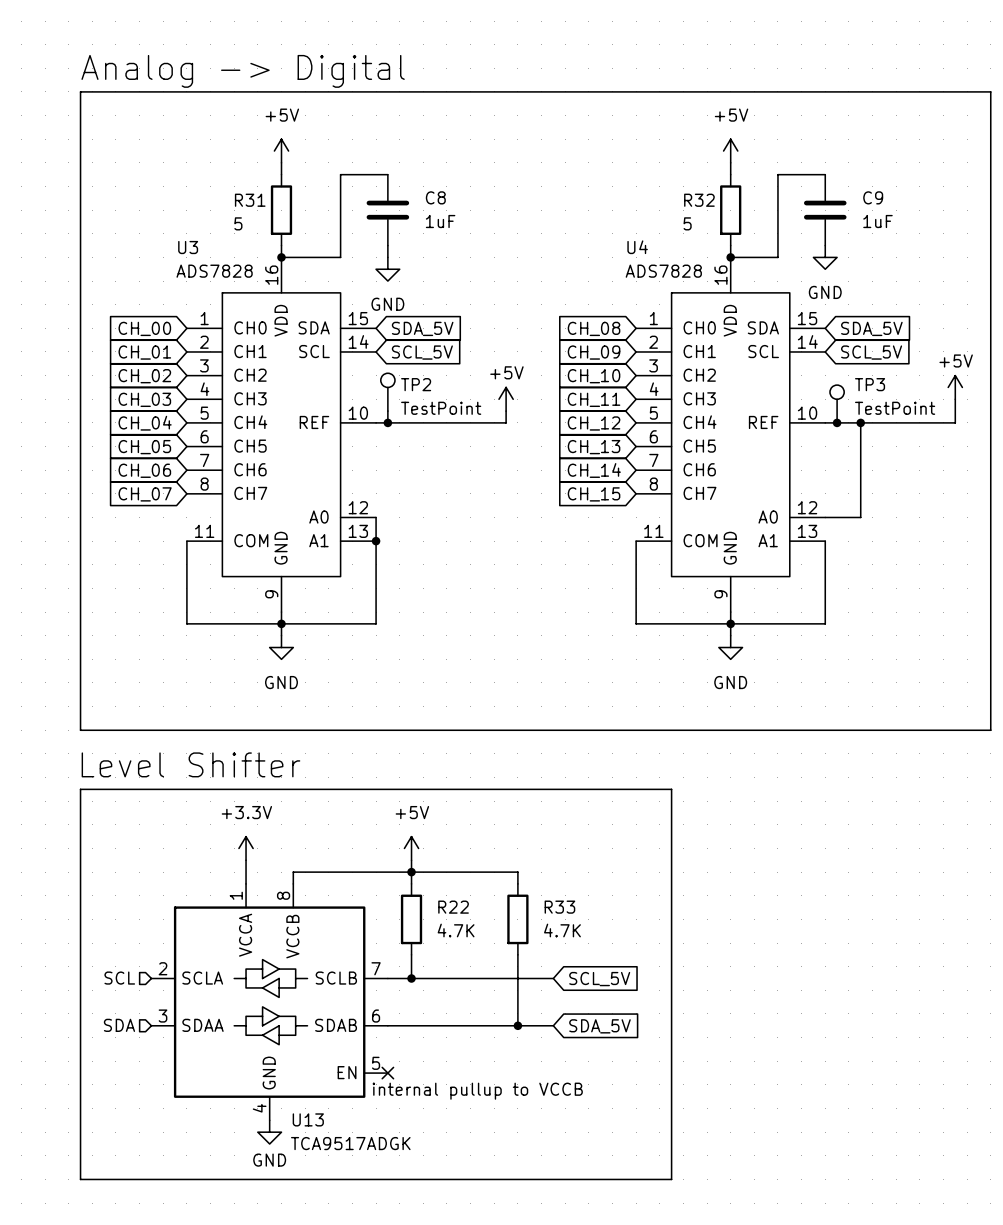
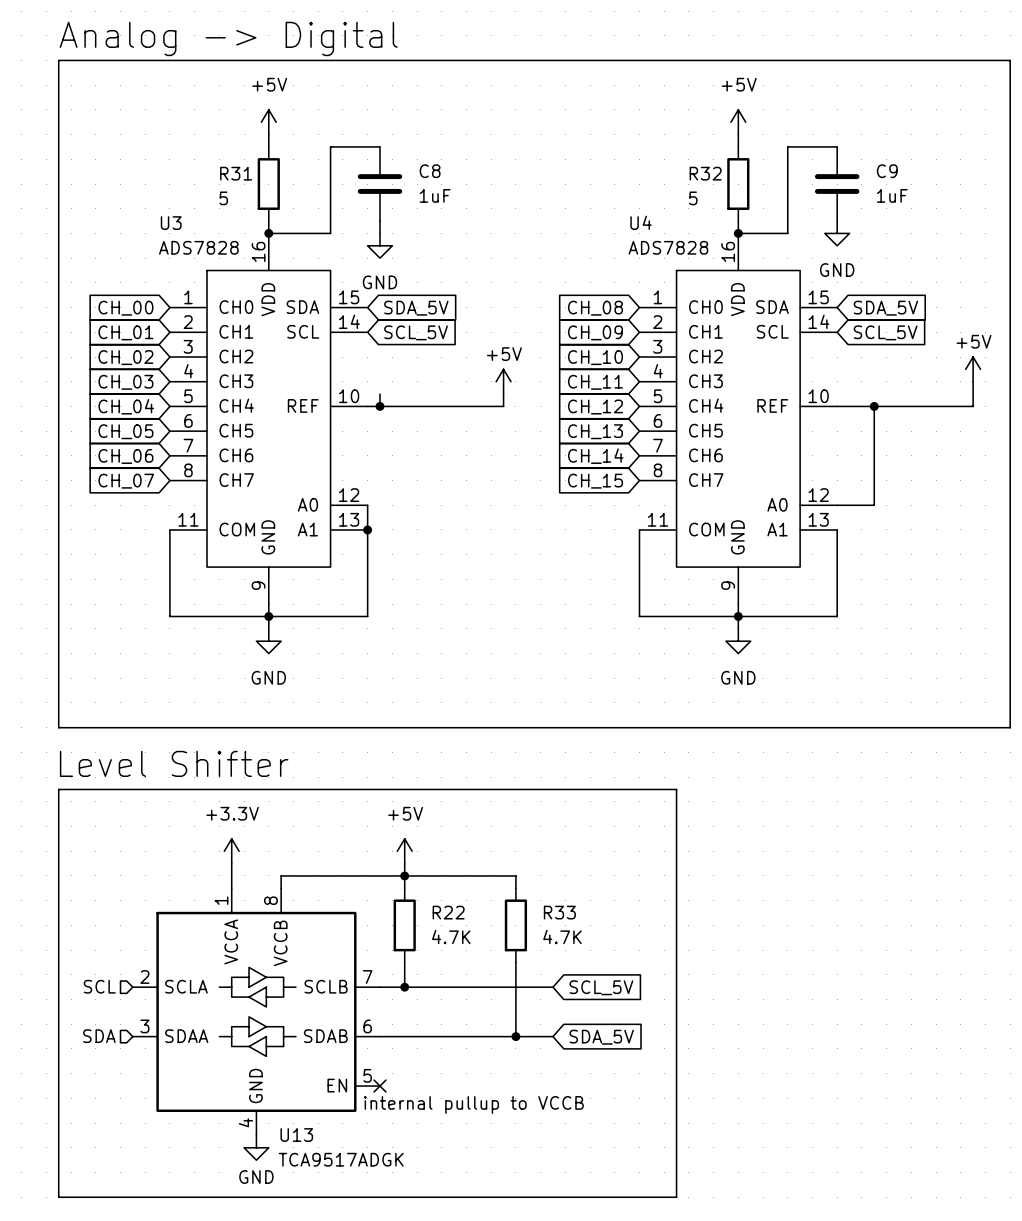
TP2: TestPoint (387, 392) -> none
TP3: TestPoint (837, 404) -> none
junction: (837, 422) -> none

